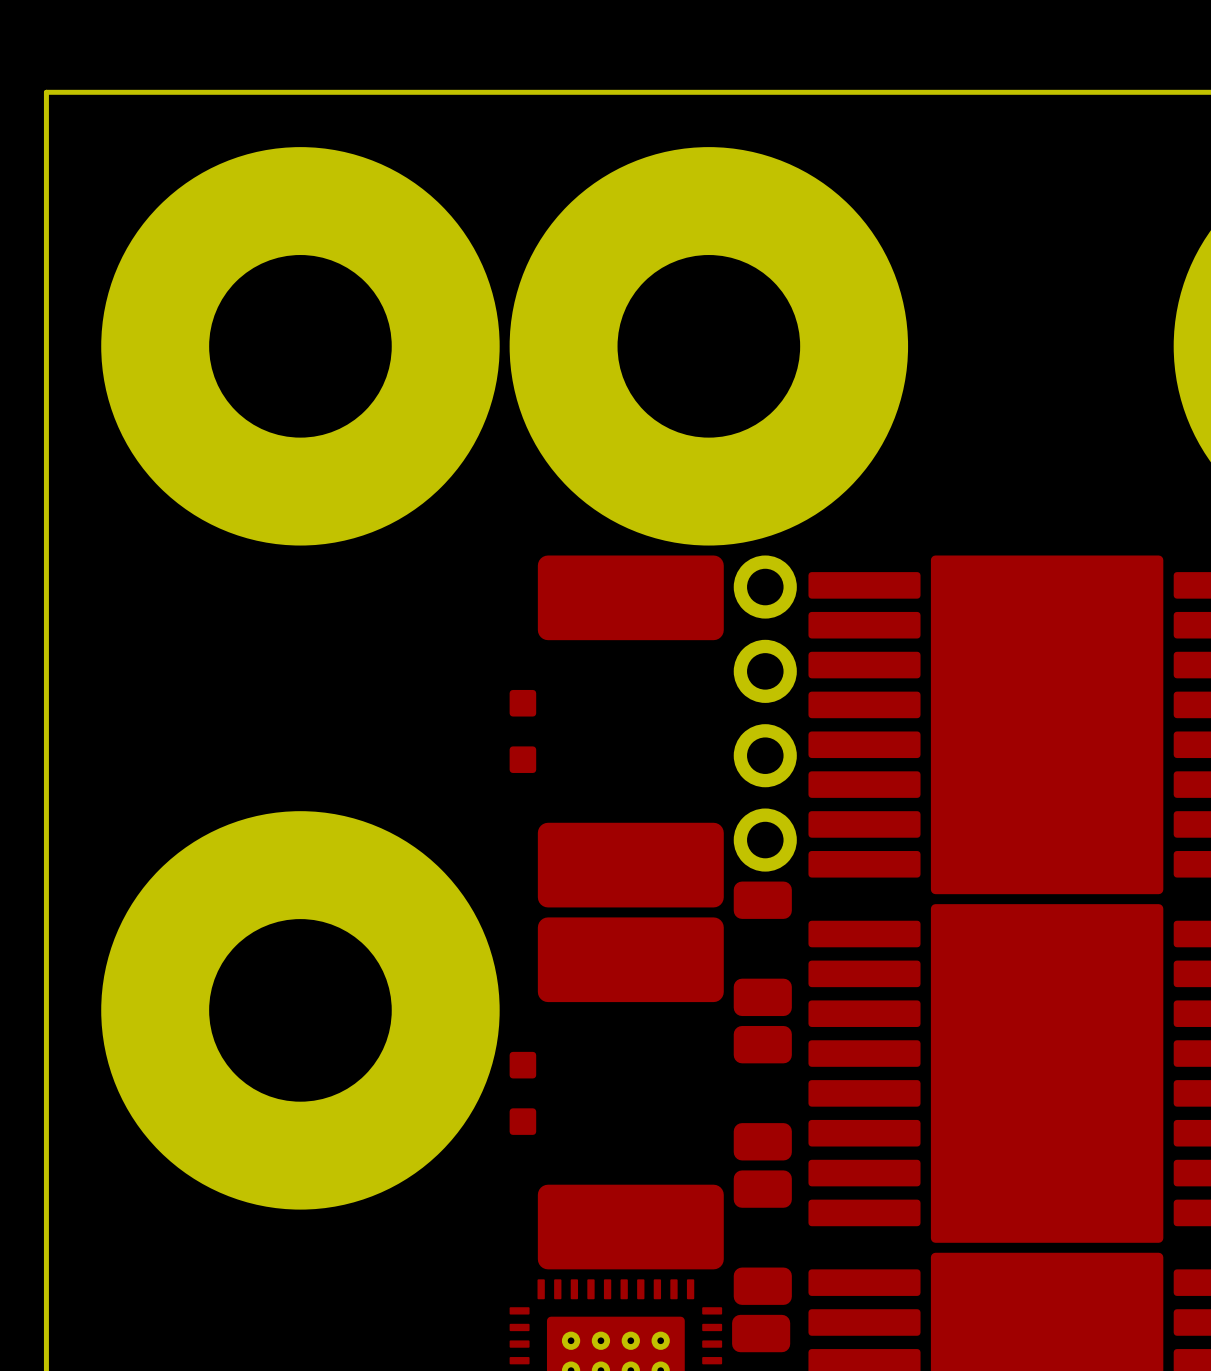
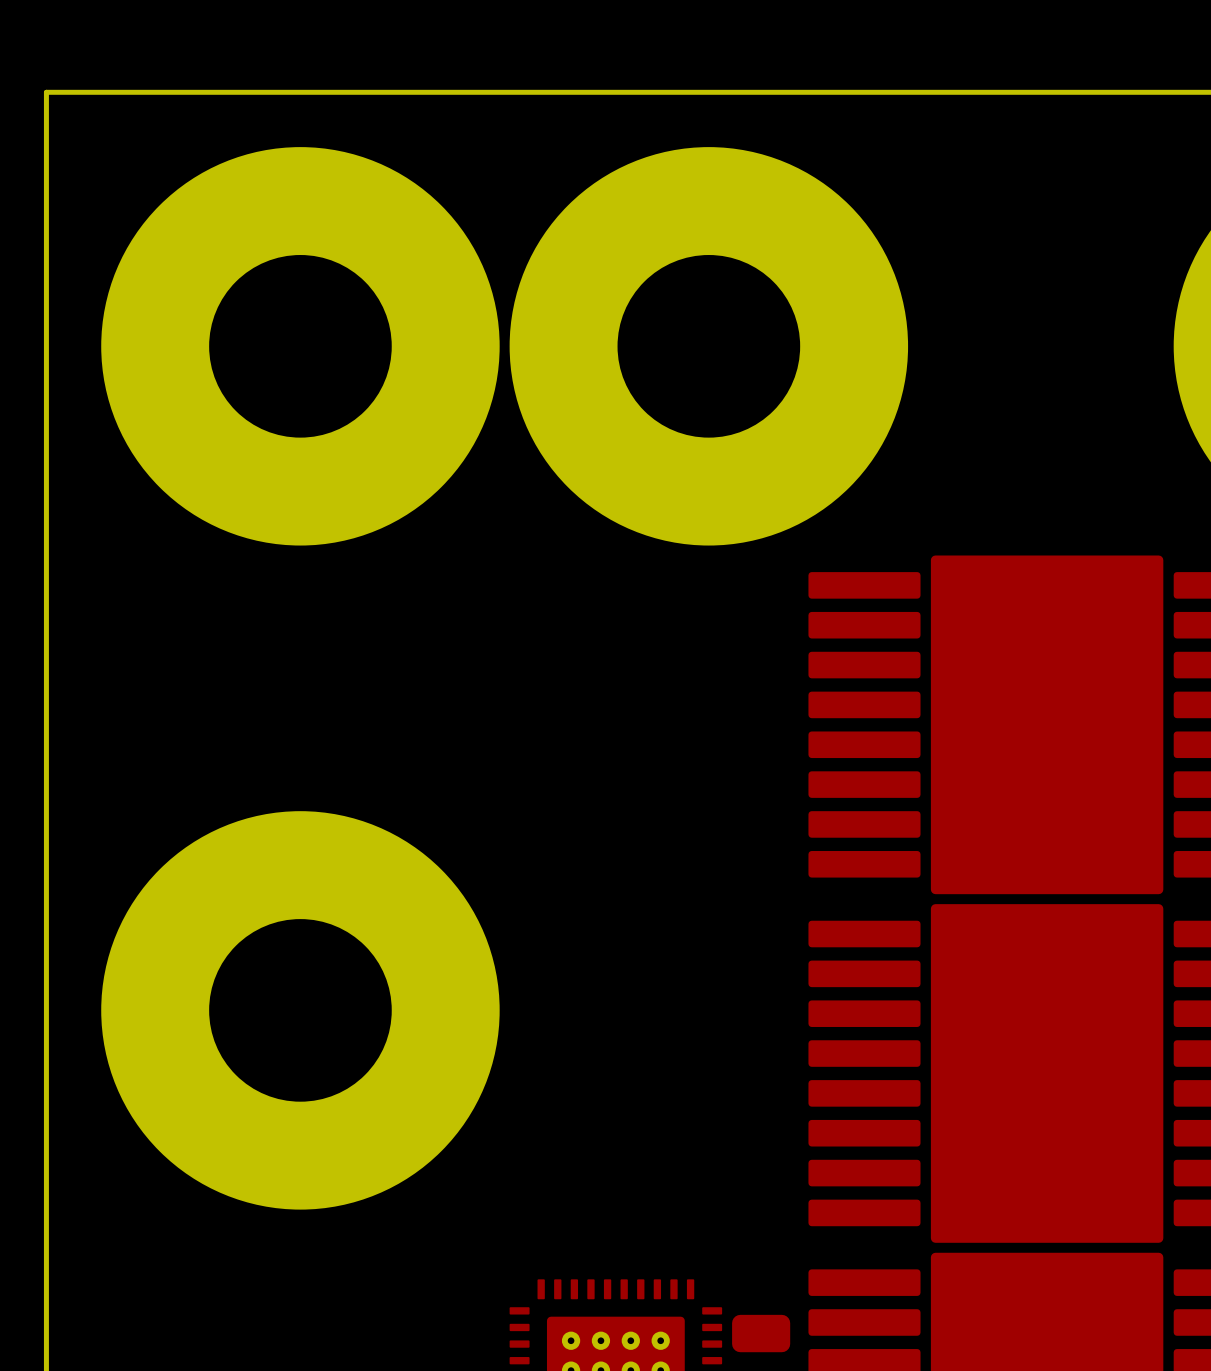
part: (765, 713) -> none
part: (616, 731) -> none
part: (762, 948) -> none
part: (616, 1093) -> none
part: (762, 1093) -> none
part: (762, 1237) -> none

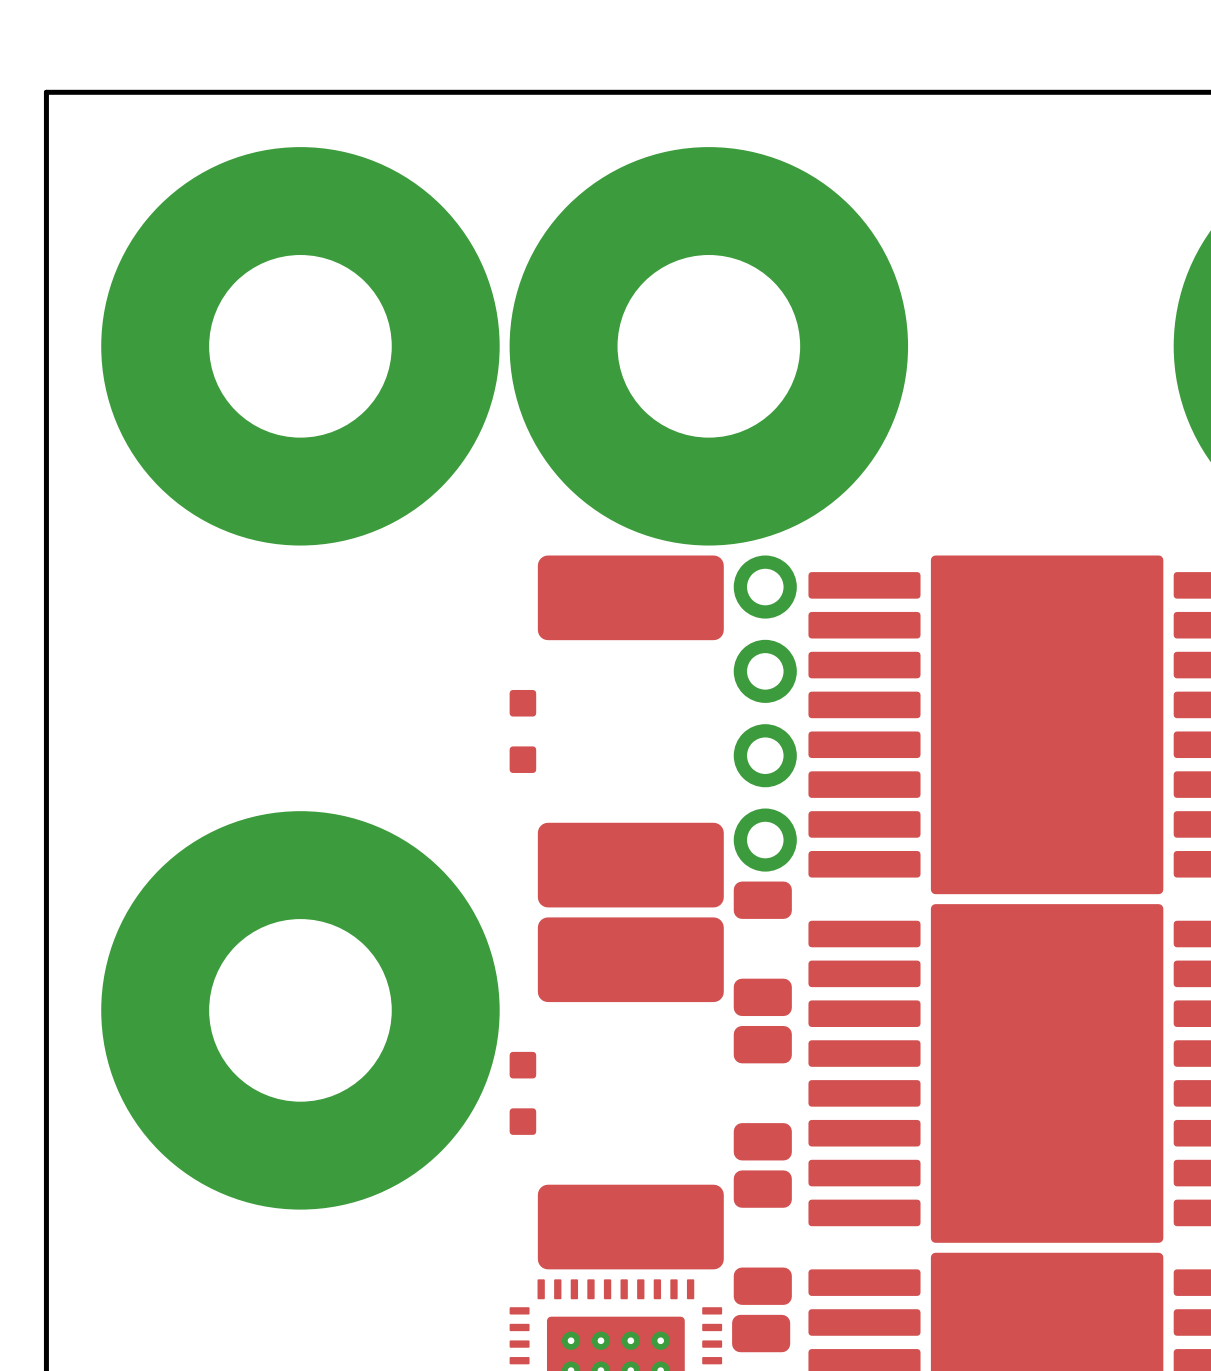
part: none -> (765, 713)
part: none -> (616, 731)
part: none -> (762, 948)
part: none -> (616, 1093)
part: none -> (762, 1093)
part: none -> (762, 1237)

